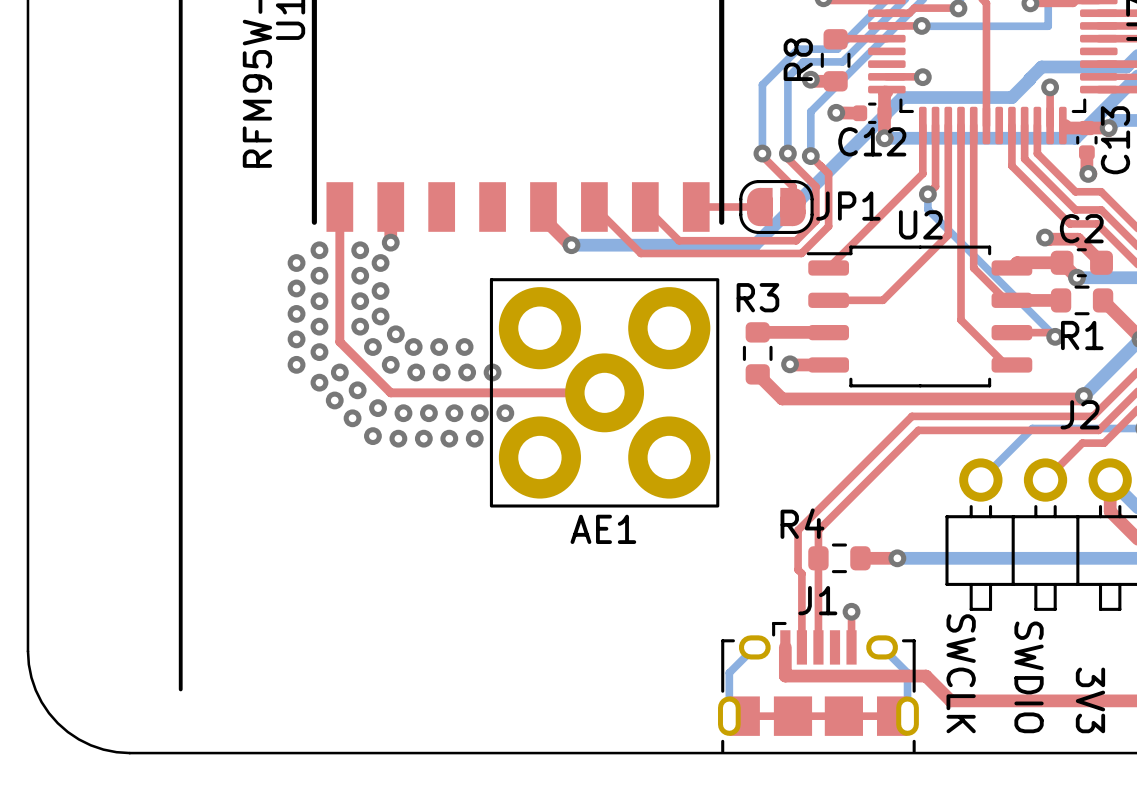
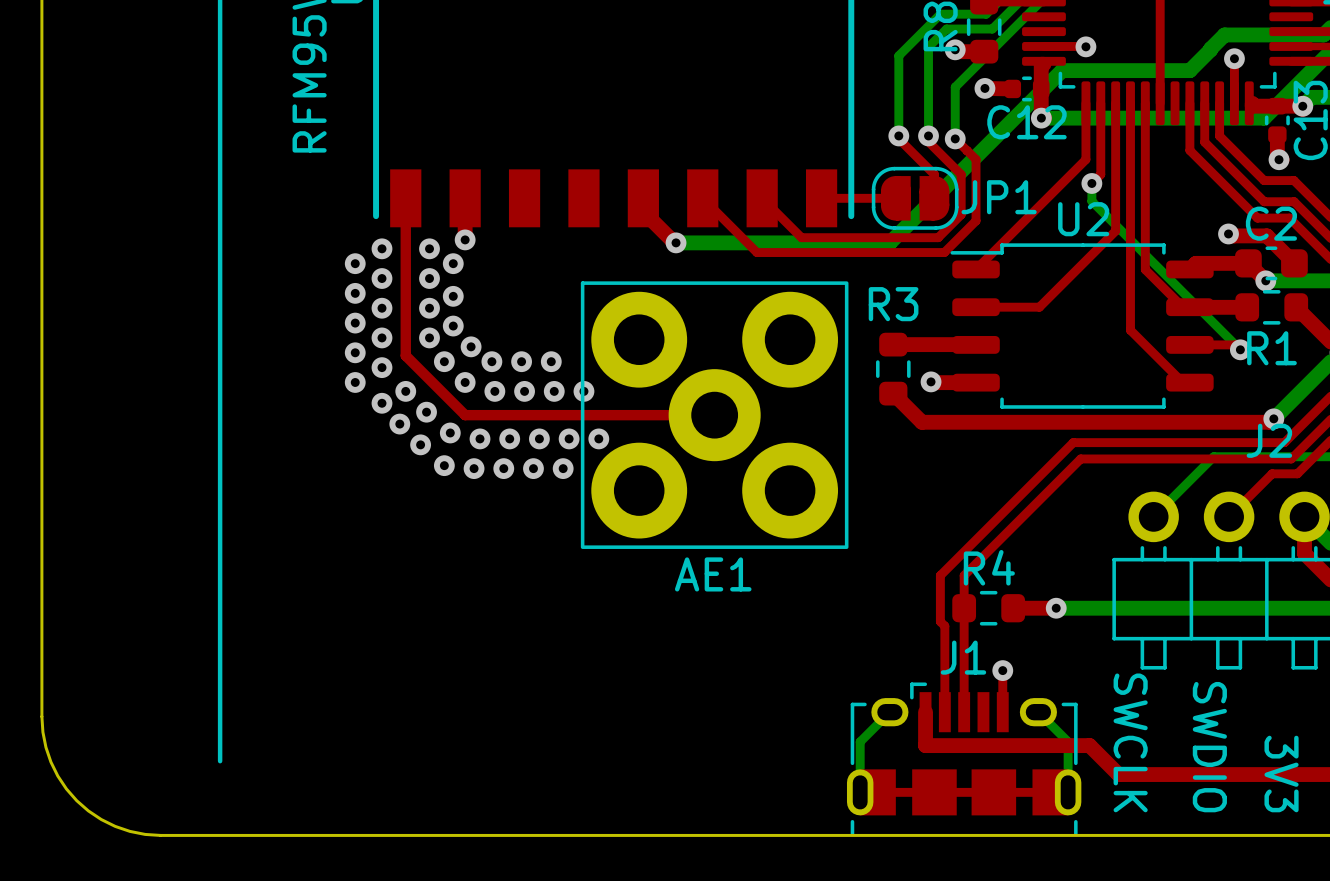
R4 name position: R4 (802, 523) -> R4 (989, 567)

